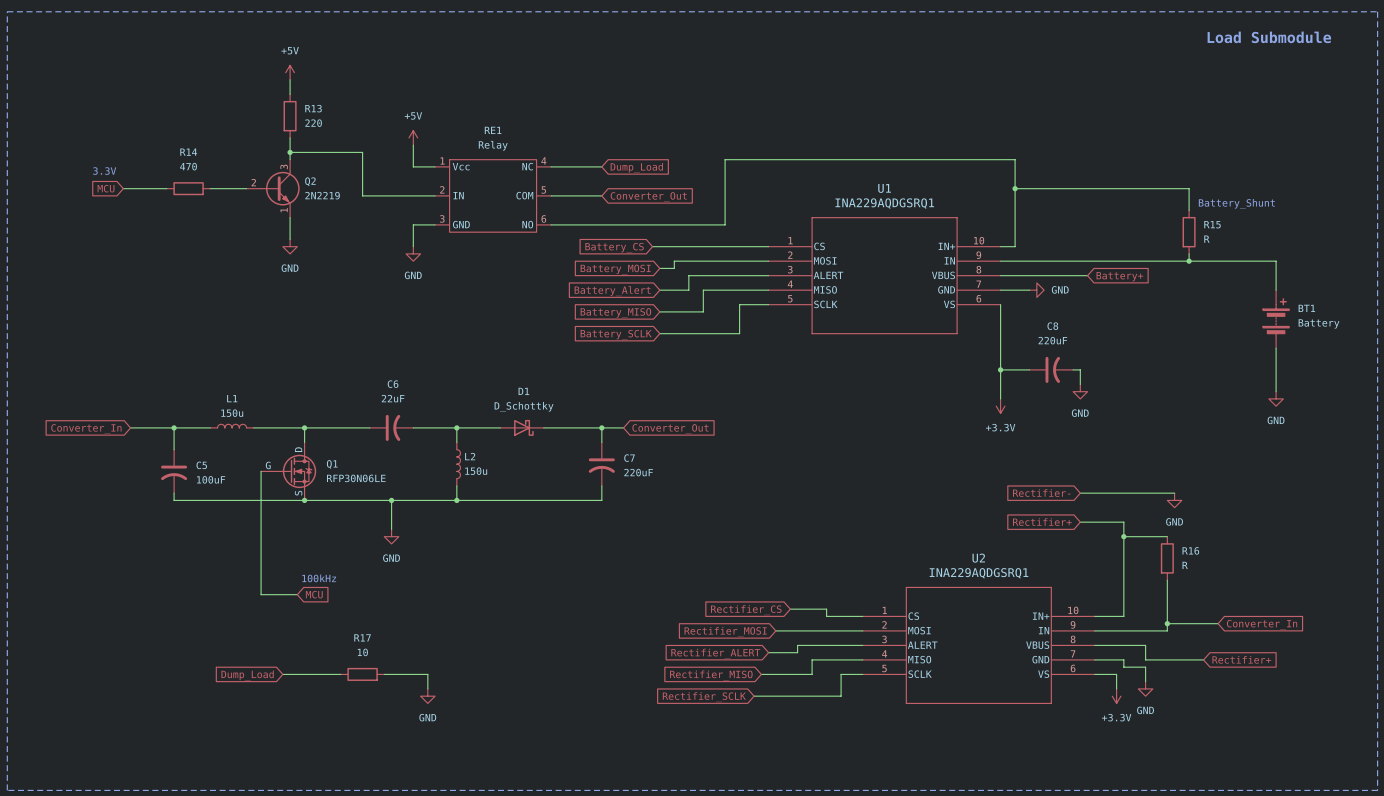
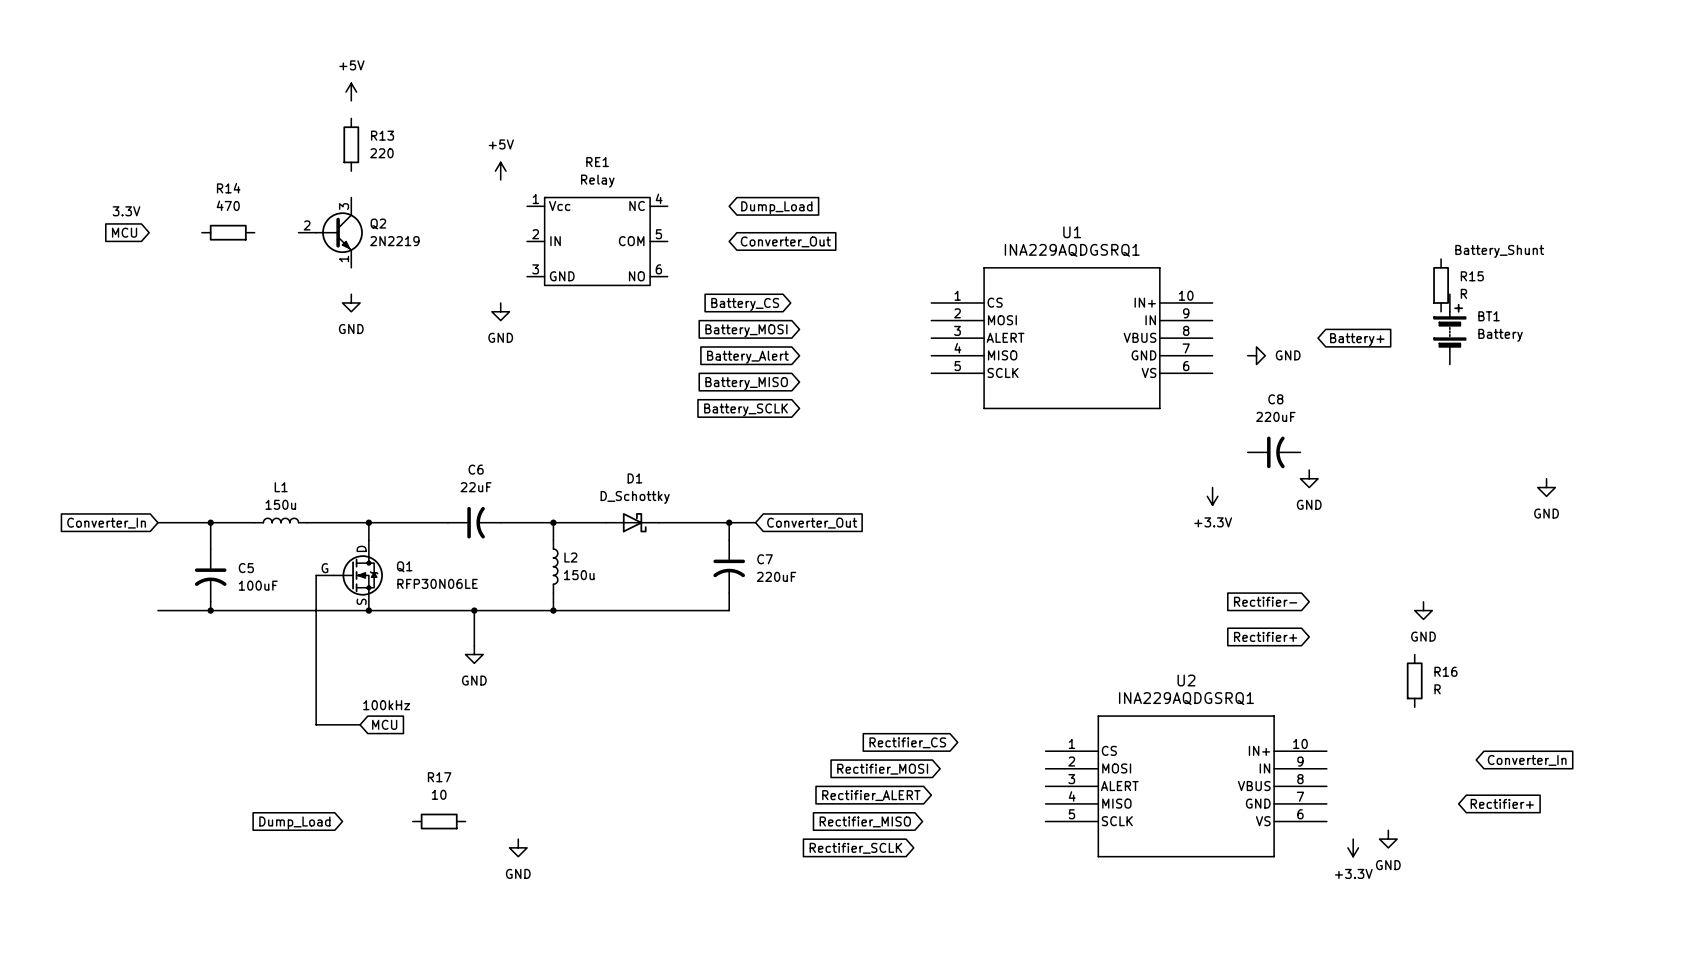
line: (7, 11) (1377, 11) (1377, 790) (7, 790) (7, 11) -> none
text: Load Submodule (1269, 37) -> none
wire: (290, 79) (290, 94) -> none
wire: (290, 137) (290, 159) -> none
wire: (413, 145) (413, 166) (435, 166) -> none
wire: (290, 152) (362, 152) (362, 195) (435, 195) -> none
junction: (290, 152) -> none
wire: (551, 166) (601, 166) -> none
wire: (123, 188) (166, 188) -> none
wire: (210, 188) (246, 188) -> none
wire: (1015, 188) (1189, 188) (1189, 210) -> none
junction: (1015, 188) -> none
wire: (551, 195) (601, 195) -> none
wire: (290, 217) (290, 239) -> none
wire: (435, 224) (413, 224) (413, 246) -> none
wire: (551, 224) (725, 224) (725, 159) (1015, 159) (1015, 246) (1000, 246) -> none
wire: (652, 246) (768, 246) -> none
wire: (1189, 253) (1189, 261) -> none
wire: (768, 261) (674, 261) (674, 268) (659, 268) -> none
wire: (1000, 261) (1276, 261) (1276, 290) -> none
junction: (1189, 261) -> none
wire: (768, 275) (688, 275) (688, 290) (659, 290) -> none
wire: (1000, 275) (1087, 275) -> none
wire: (768, 290) (703, 290) (703, 311) (659, 311) -> none
wire: (1000, 290) (1029, 290) -> none
wire: (768, 304) (739, 304) (739, 333) (659, 333) -> none
wire: (1000, 304) (1000, 398) -> none
BT1 position: (1276, 319) -> (1449, 329)
wire: (1276, 348) (1276, 391) -> none
wire: (1000, 369) (1029, 369) -> none
junction: (1000, 369) -> none
wire: (1073, 369) (1080, 369) (1080, 384) -> none
wire: (1080, 493) (1174, 493) -> none
wire: none -> (157, 610) (210, 610)
junction: none -> (210, 610)
wire: (1080, 522) (1123, 522) (1123, 616) (1094, 616) -> none
wire: (1123, 536) (1167, 536) -> none
junction: (1123, 536) -> none
wire: (1167, 580) (1167, 630) (1094, 630) -> none
wire: (790, 609) (826, 609) (826, 616) (862, 616) -> none
wire: (1167, 623) (1218, 623) -> none
junction: (1167, 623) -> none
wire: (775, 630) (862, 630) -> none
wire: (862, 645) (797, 645) (797, 652) (768, 652) -> none
wire: (1094, 645) (1145, 645) (1145, 659) (1203, 659) -> none
wire: (862, 659) (812, 659) (812, 674) (761, 674) -> none
wire: (1094, 659) (1123, 659) (1123, 667) (1145, 667) (1145, 681) -> none
wire: (282, 674) (340, 674) -> none
wire: (384, 674) (427, 674) (427, 688) -> none
wire: (862, 674) (841, 674) (841, 696) (754, 696) -> none
wire: (1094, 674) (1116, 674) (1116, 688) -> none

